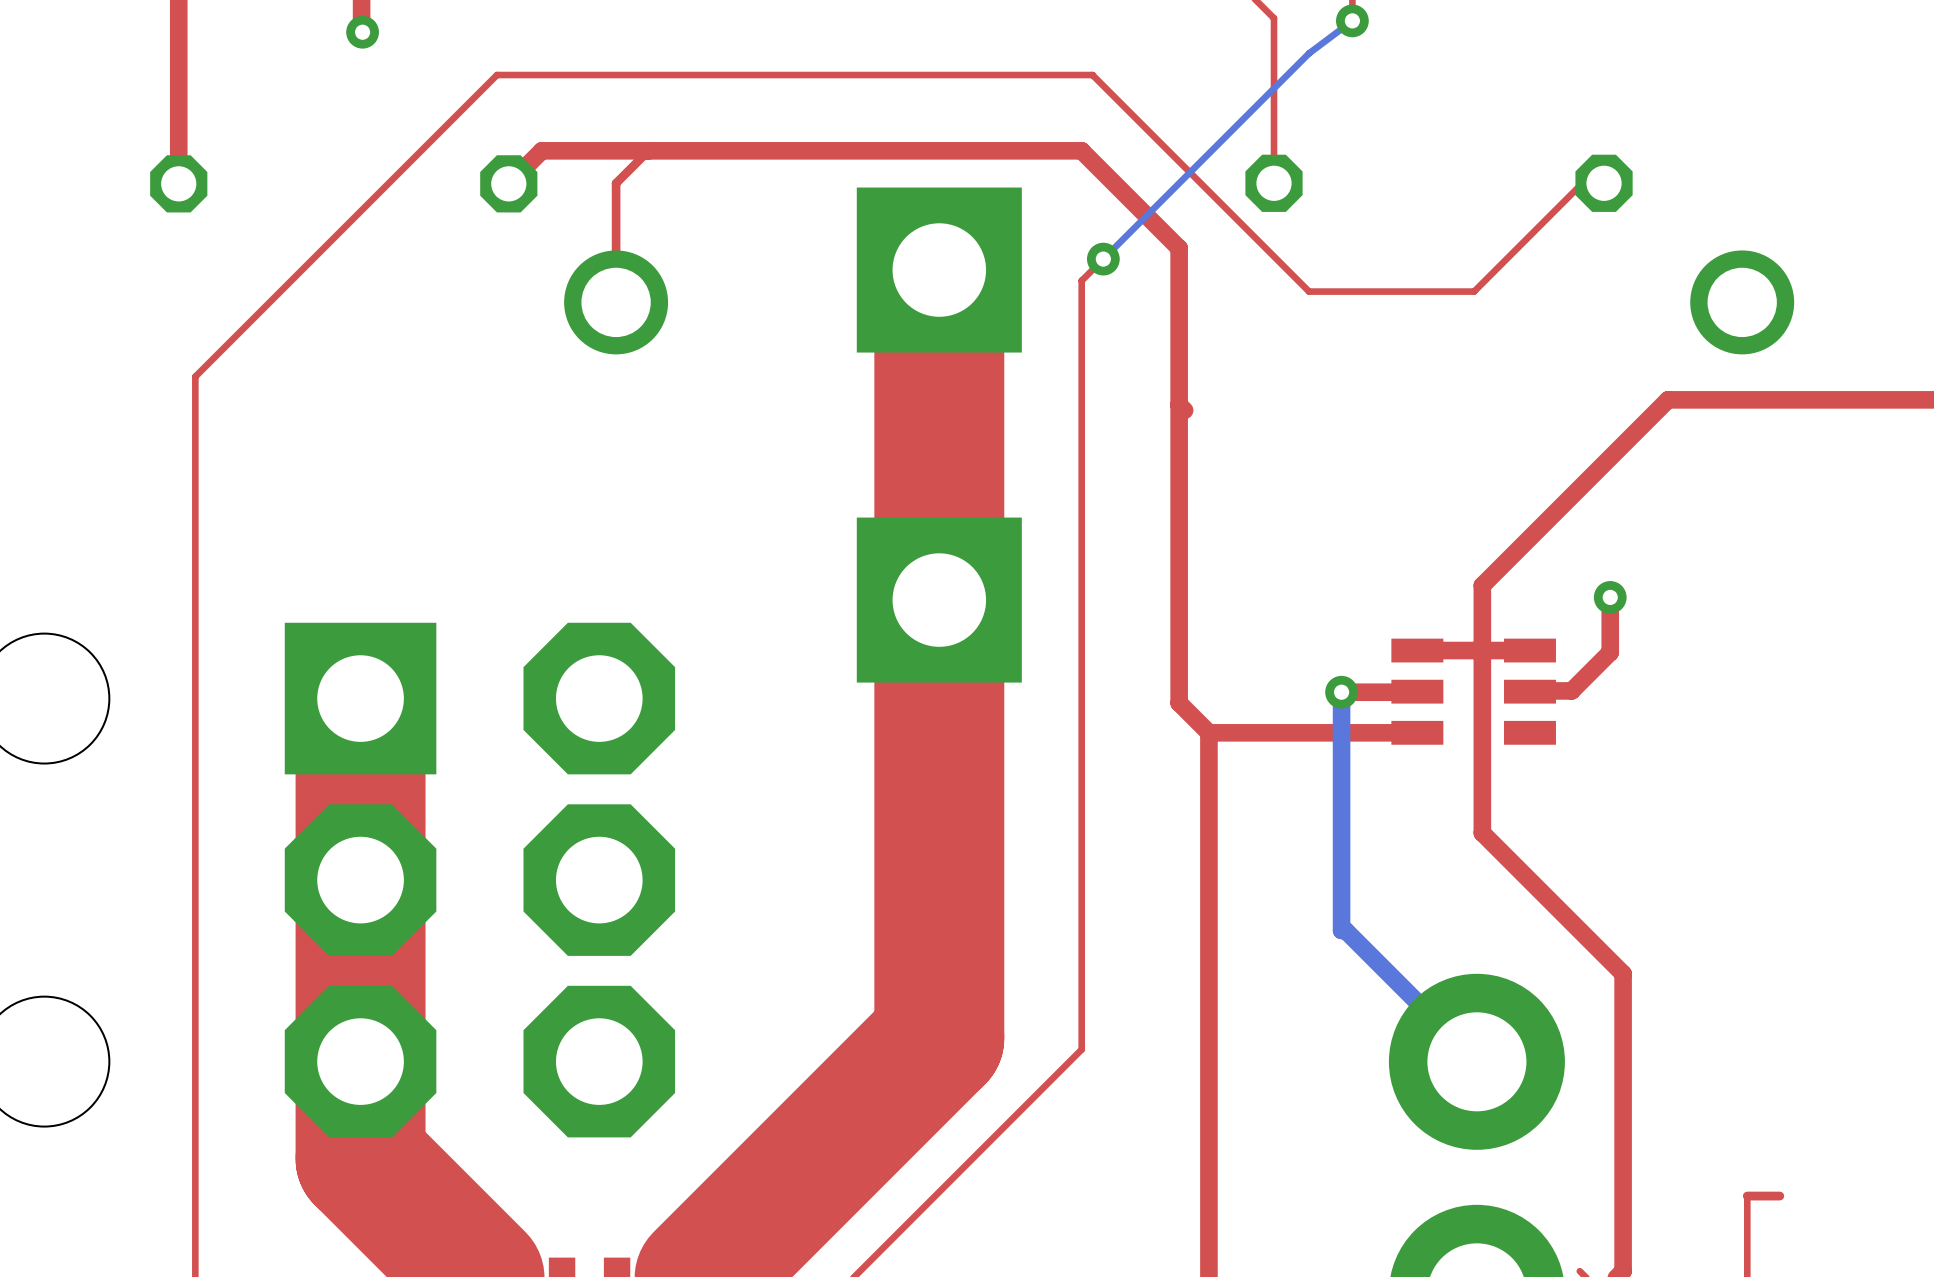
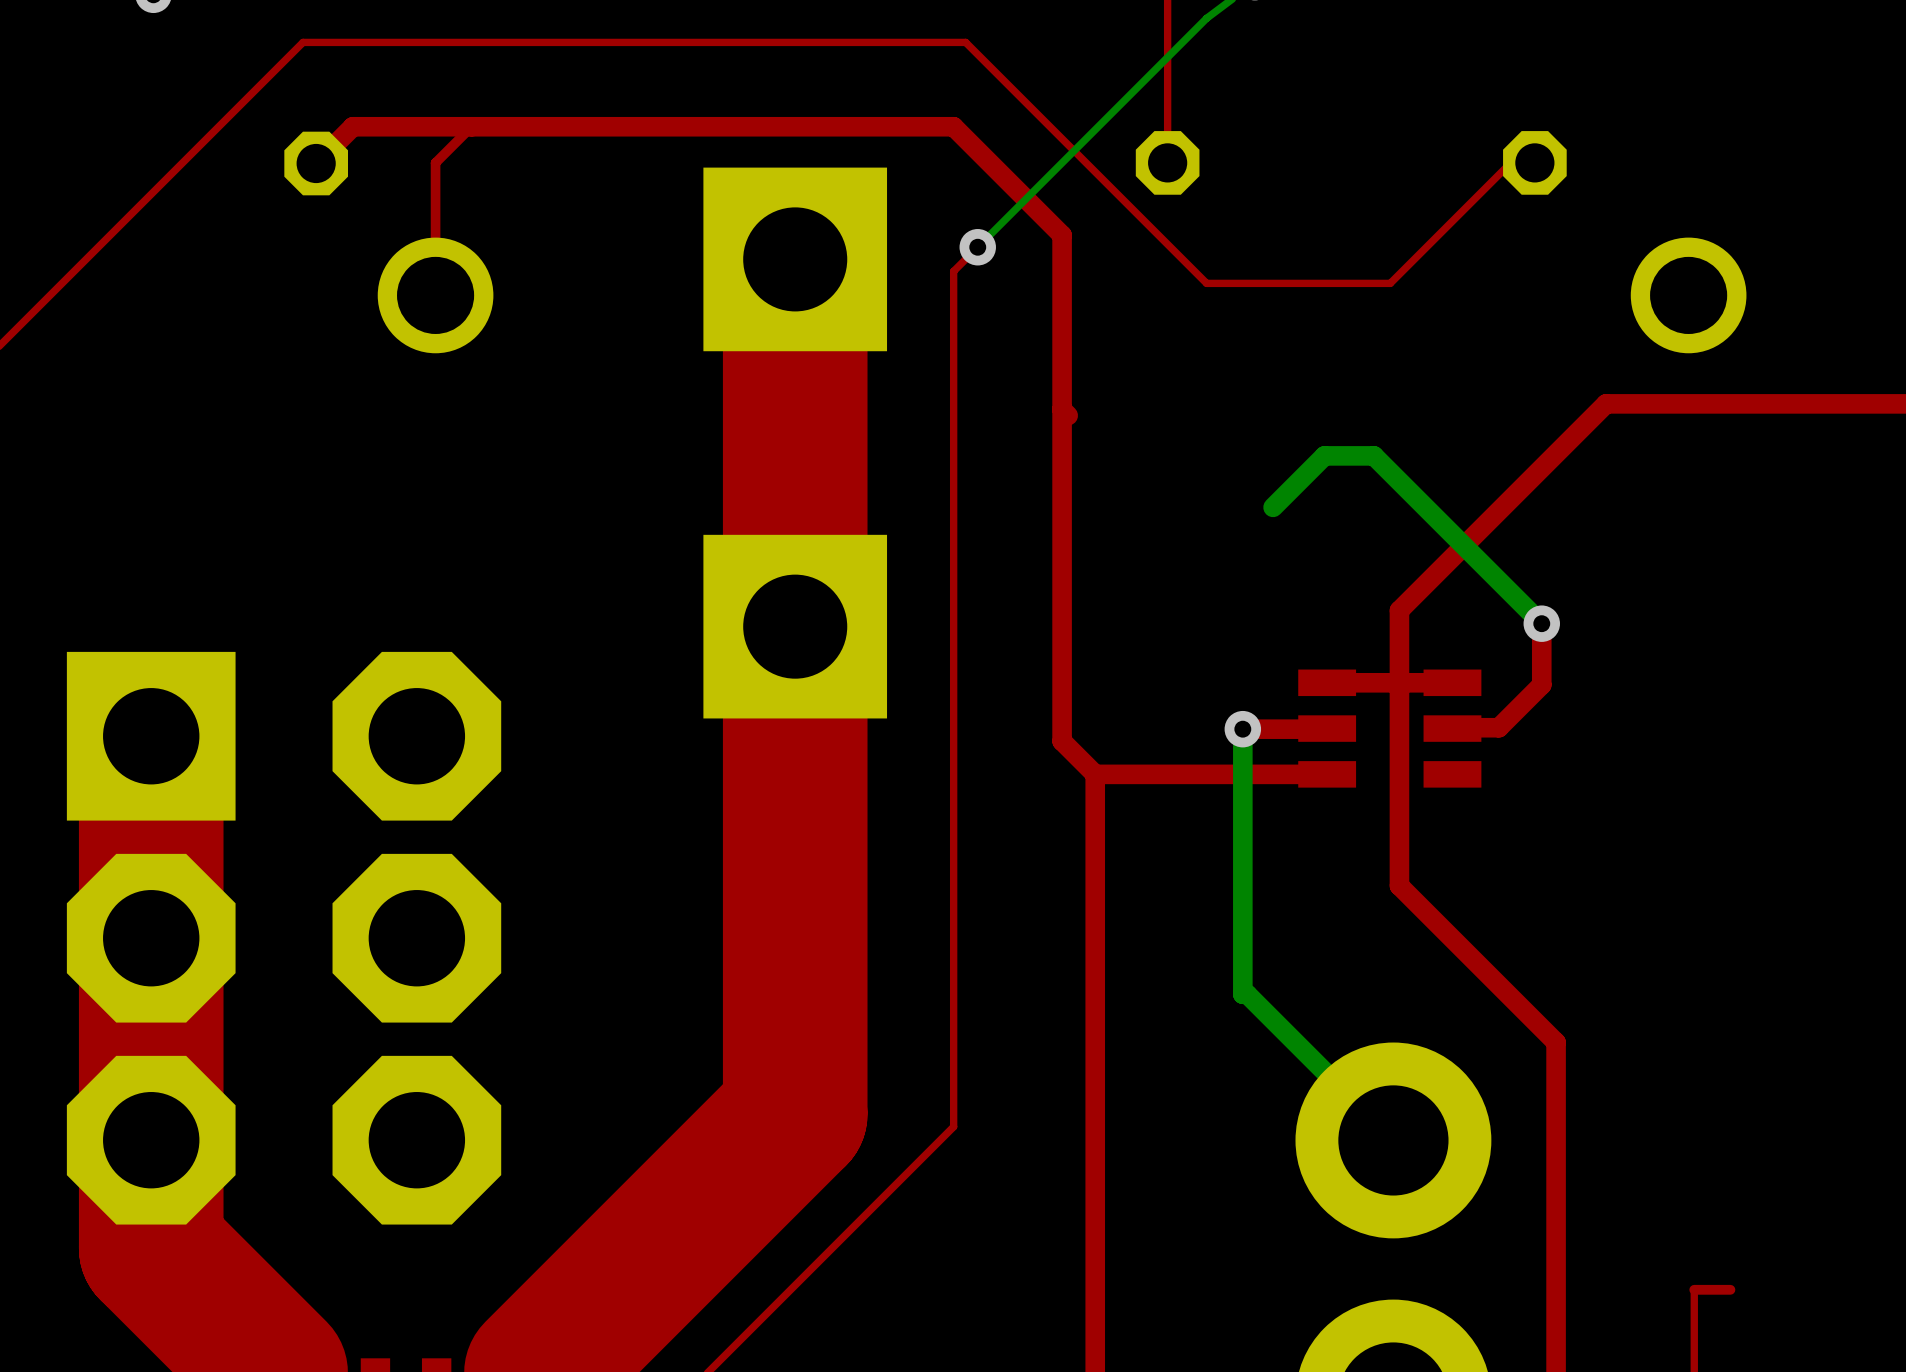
bottom track: none -> (1273, 507) (1324, 455) (1373, 455) (1541, 623)

